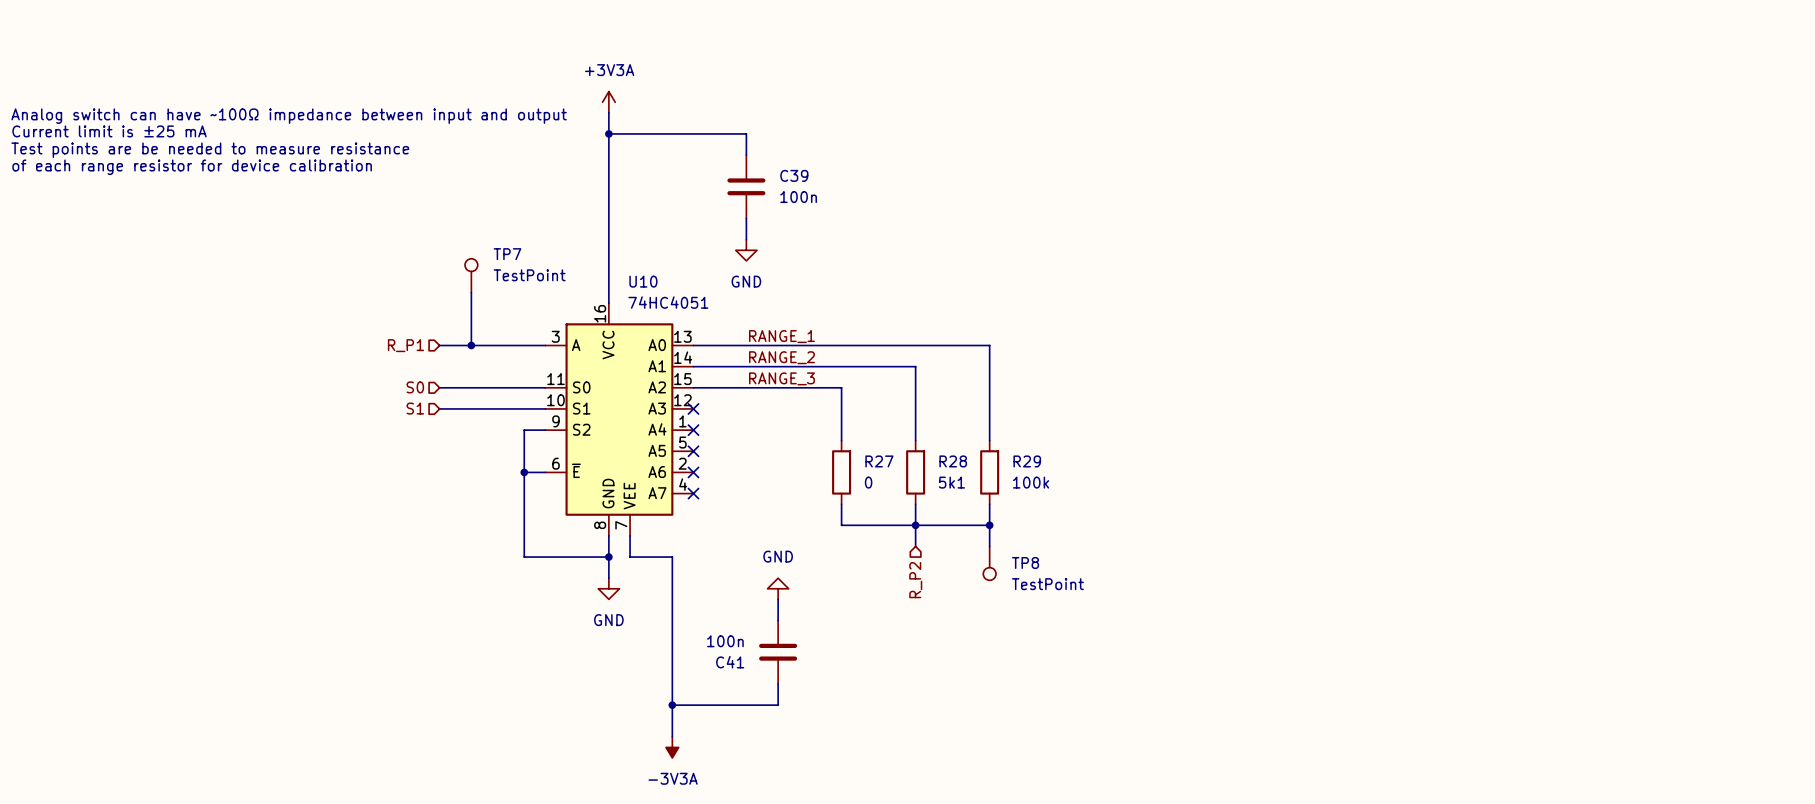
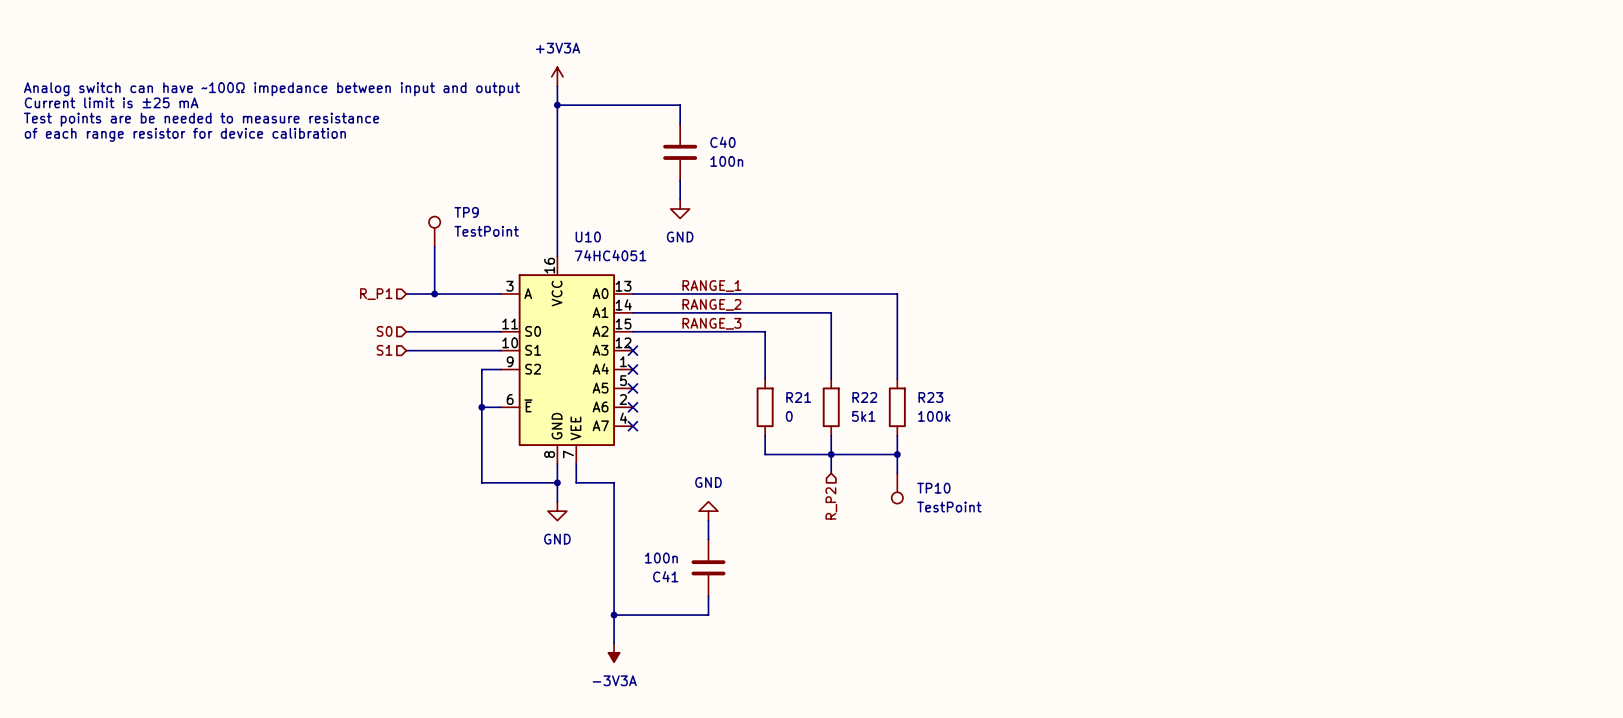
C39 name: C39 (794, 175) -> C40 (722, 142)
TP7 name: TP7 (507, 254) -> TP9 (466, 212)
R27 name: R27 (879, 461) -> R21 (798, 397)
R28 name: R28 (953, 461) -> R22 (864, 397)
R29 name: R29 (1027, 461) -> R23 (930, 397)
TP8 name: TP8 (1025, 562) -> TP10 (933, 488)

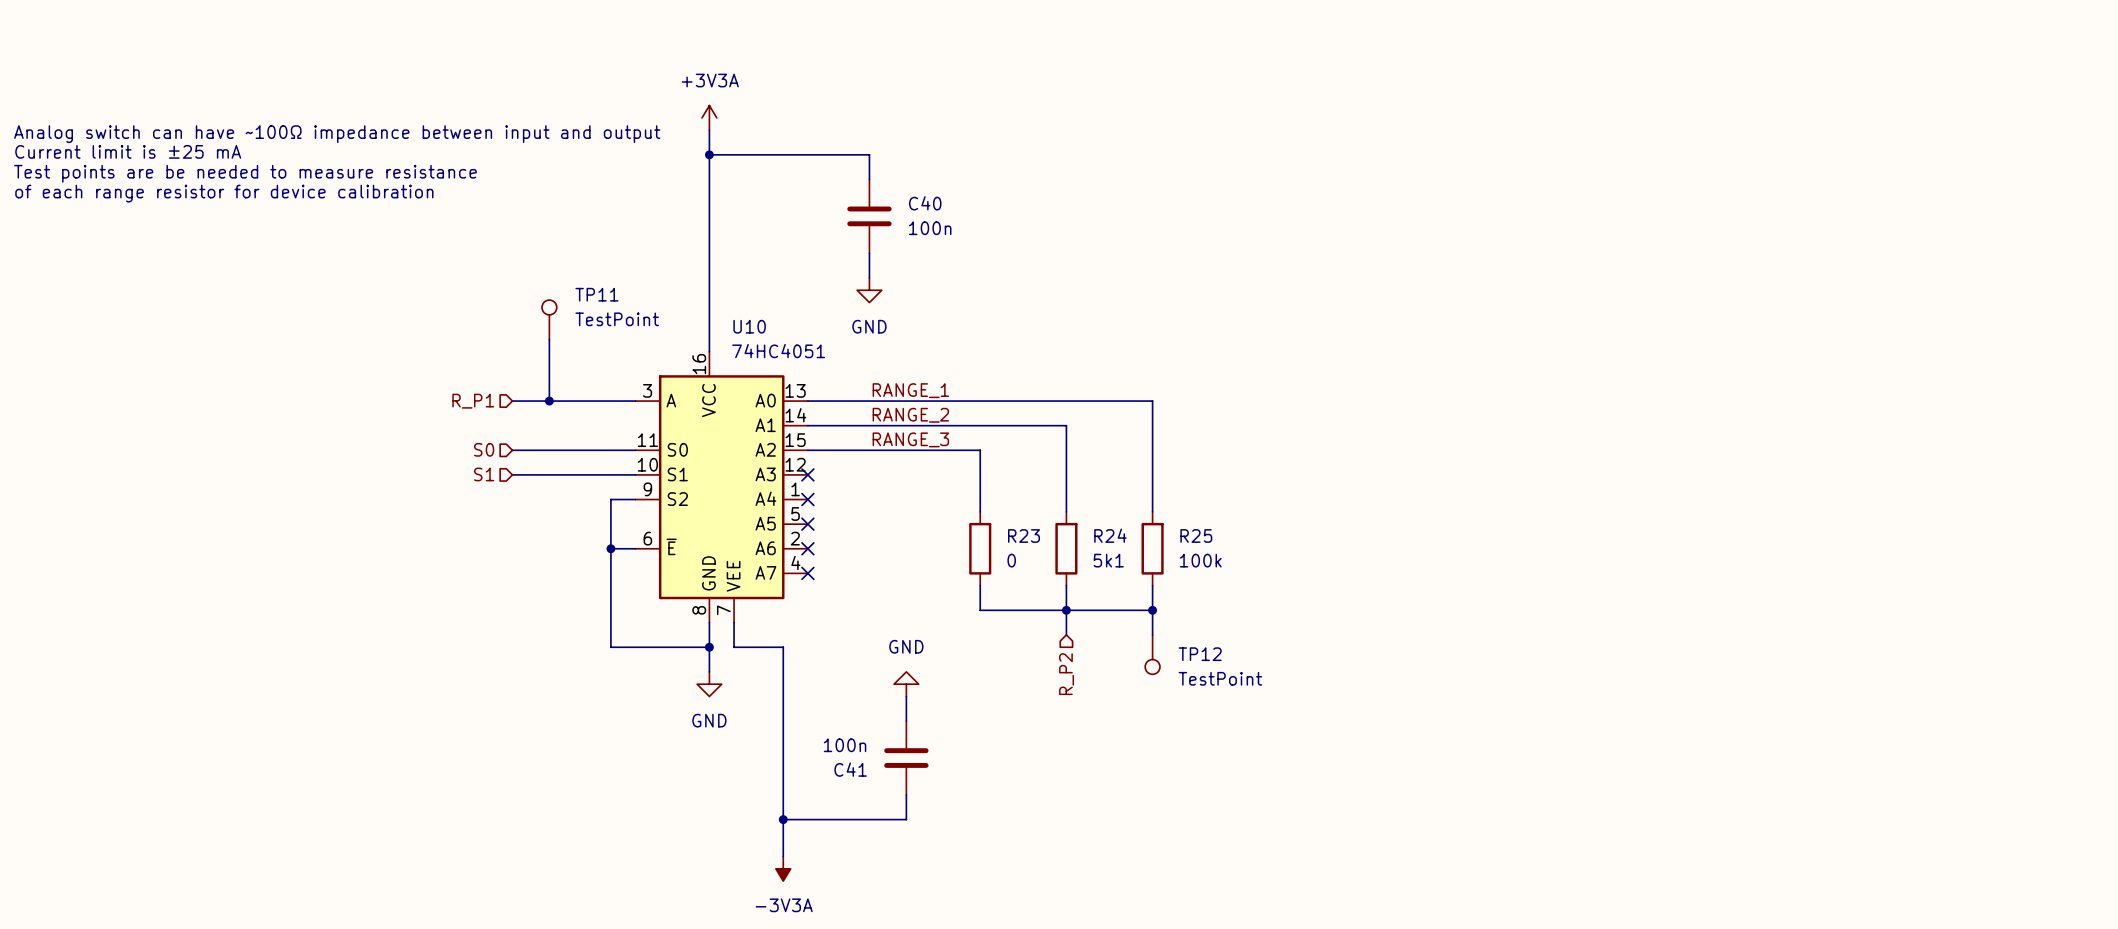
TP9 name: TP9 (466, 212) -> TP11 (596, 294)
R21 name: R21 (798, 397) -> R23 (1024, 536)
R22 name: R22 (864, 397) -> R24 (1110, 535)
R23 name: R23 (930, 397) -> R25 (1196, 536)
TP10 name: TP10 (933, 488) -> TP12 (1200, 654)

